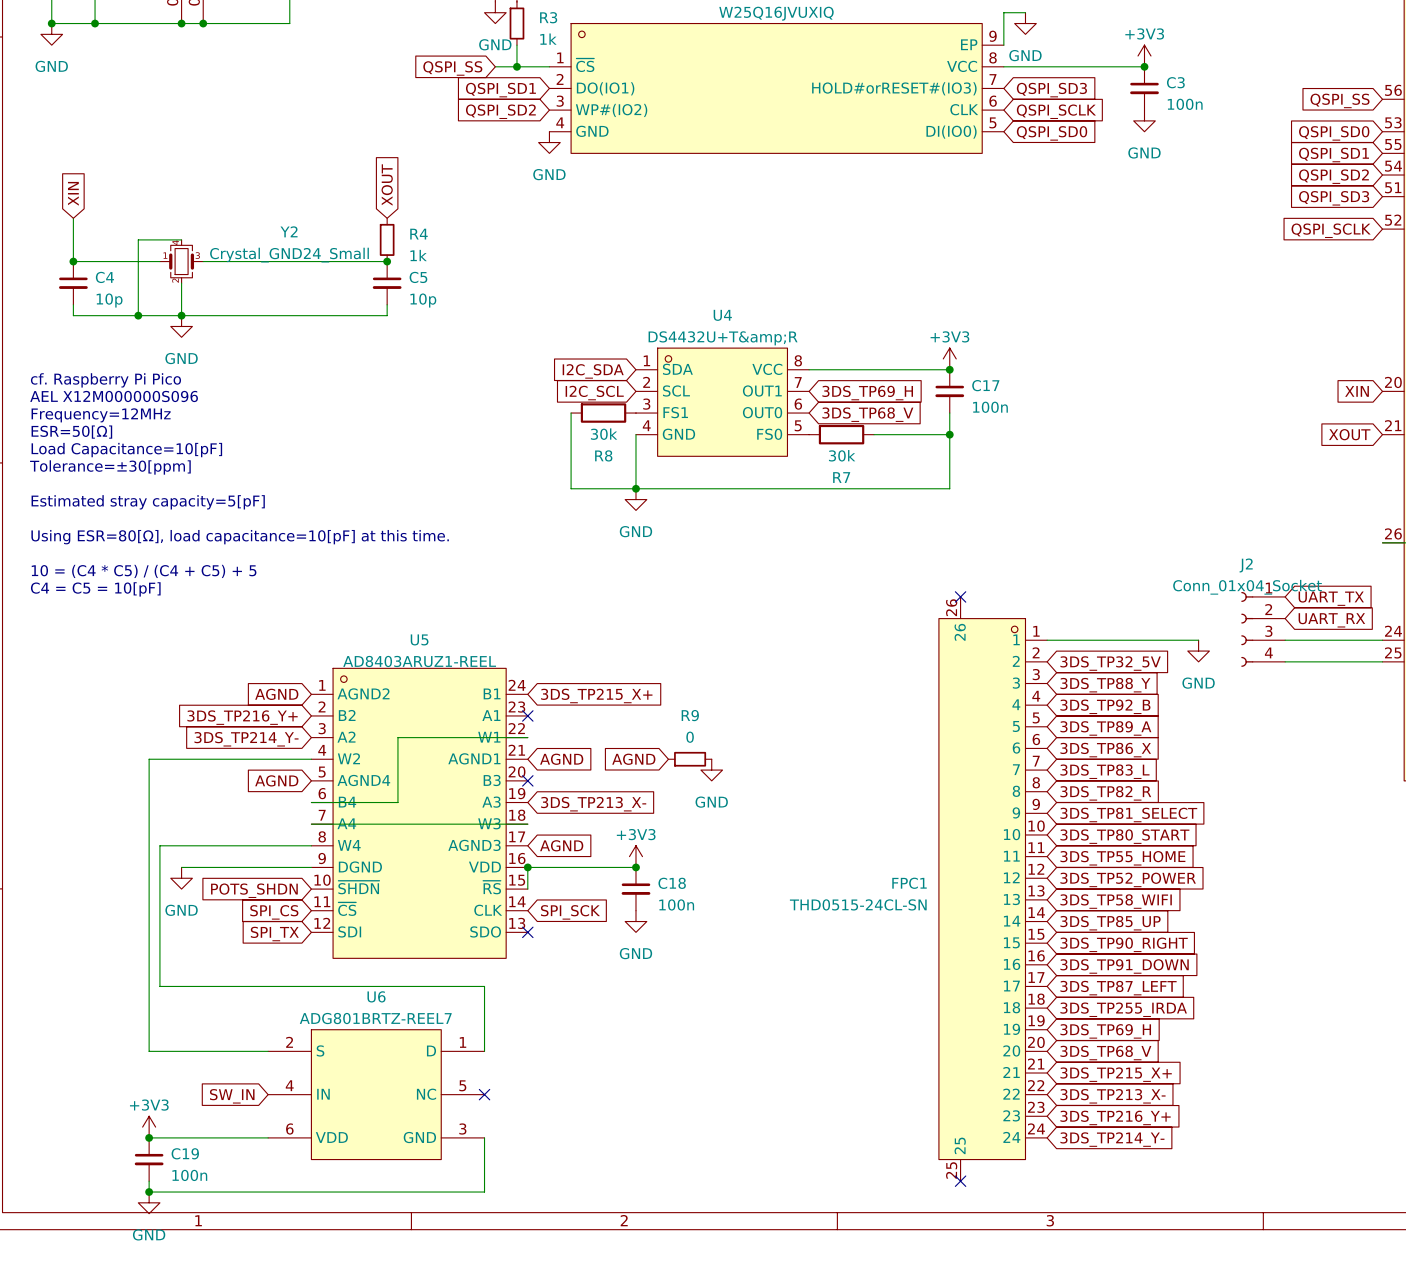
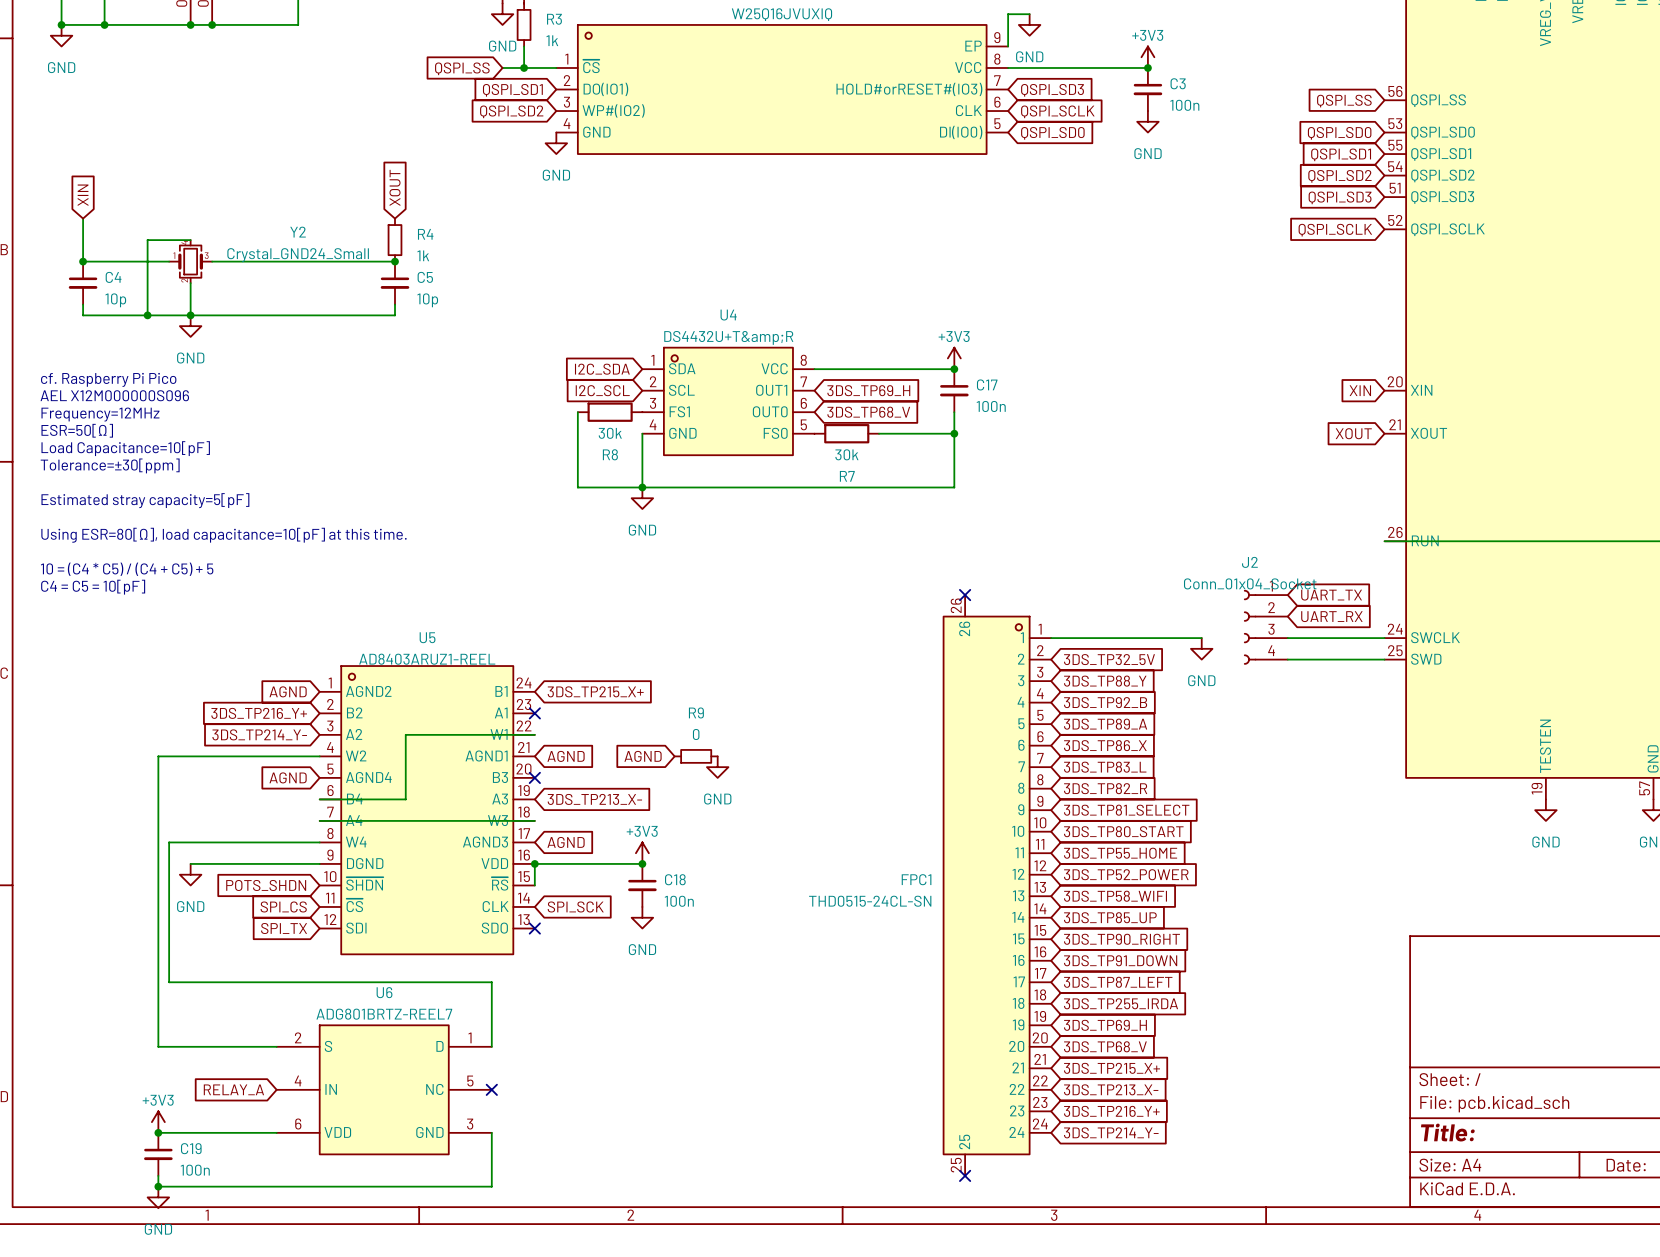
global label: SW_IN (232, 1096) -> RELAY_A (233, 1089)

